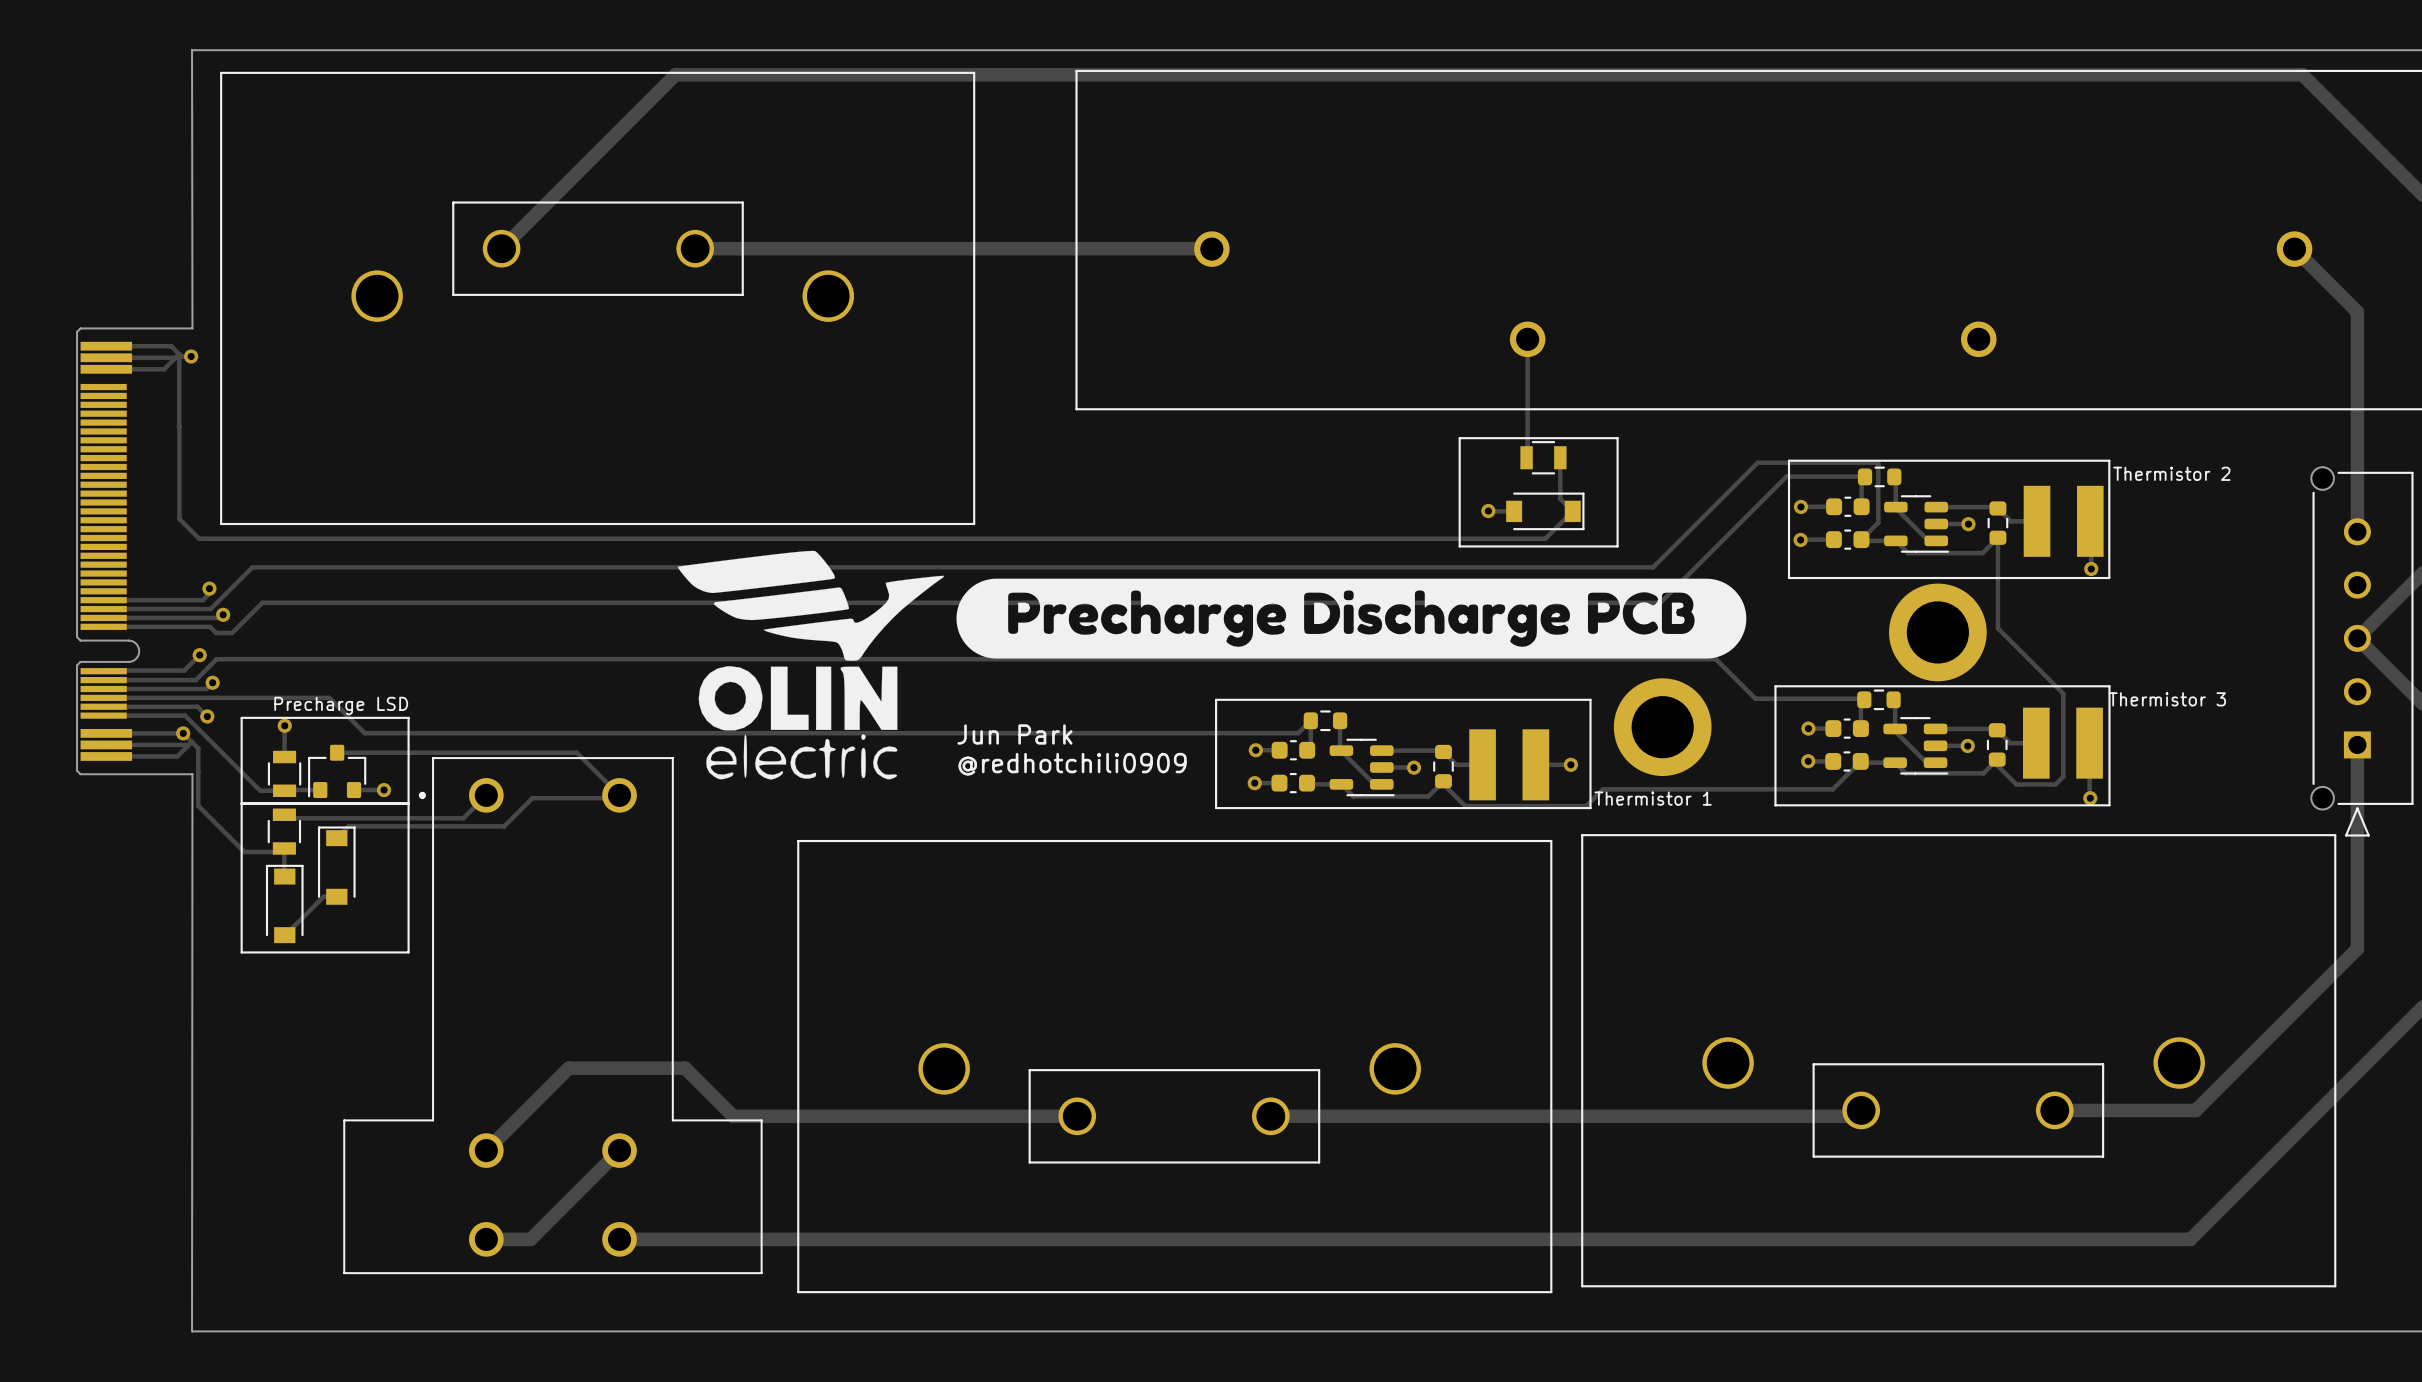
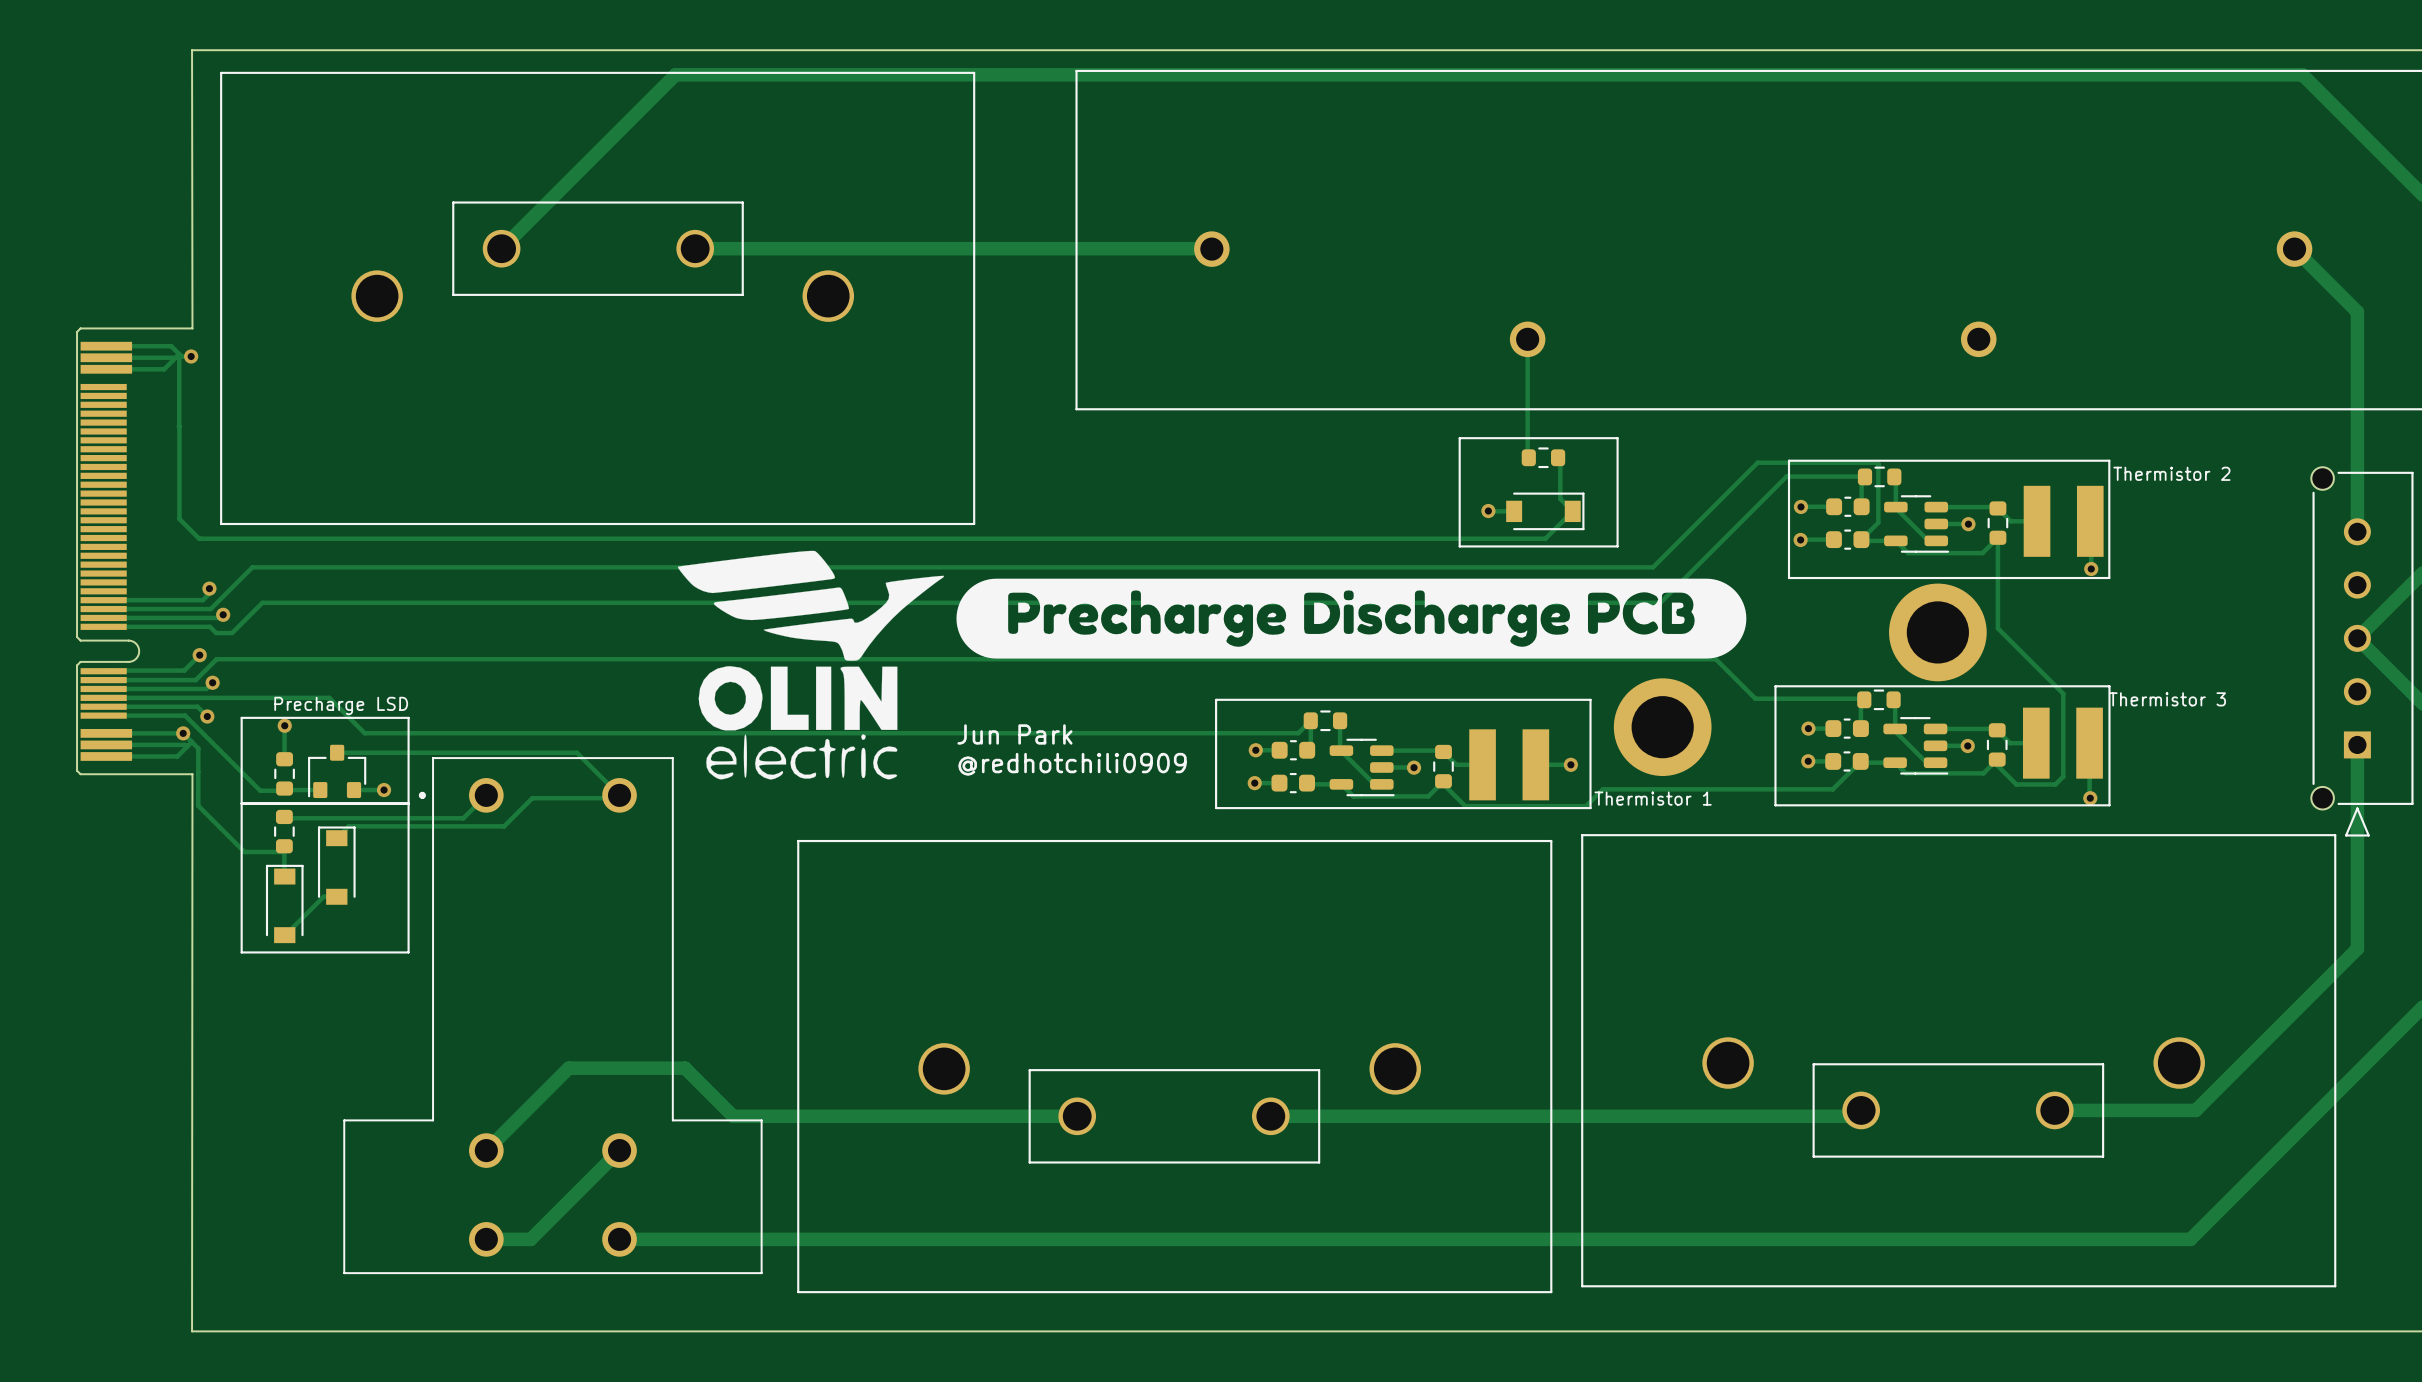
part footprint: [1520, 441, 1567, 475] -> [1521, 447, 1566, 469]
part footprint: [267, 750, 302, 797] -> [274, 752, 295, 796]
part footprint: [267, 808, 302, 855] -> [274, 809, 295, 854]

